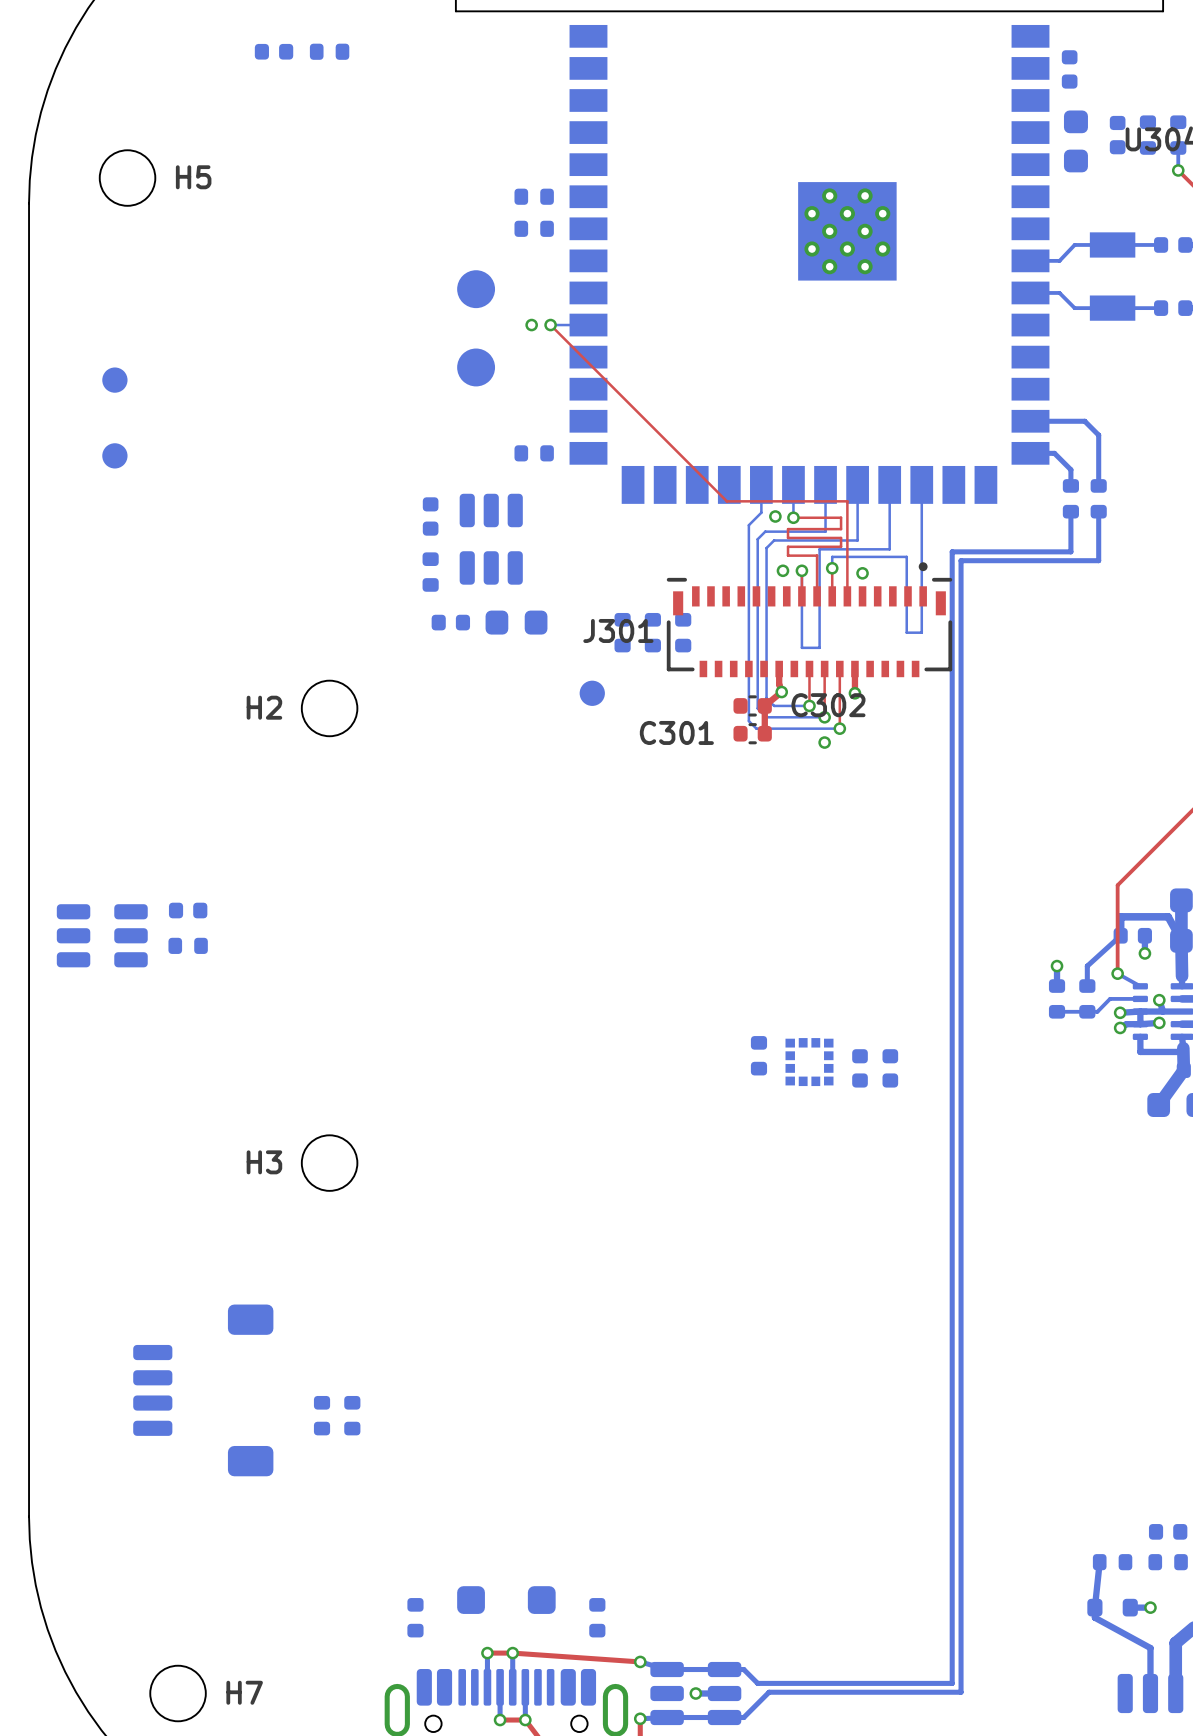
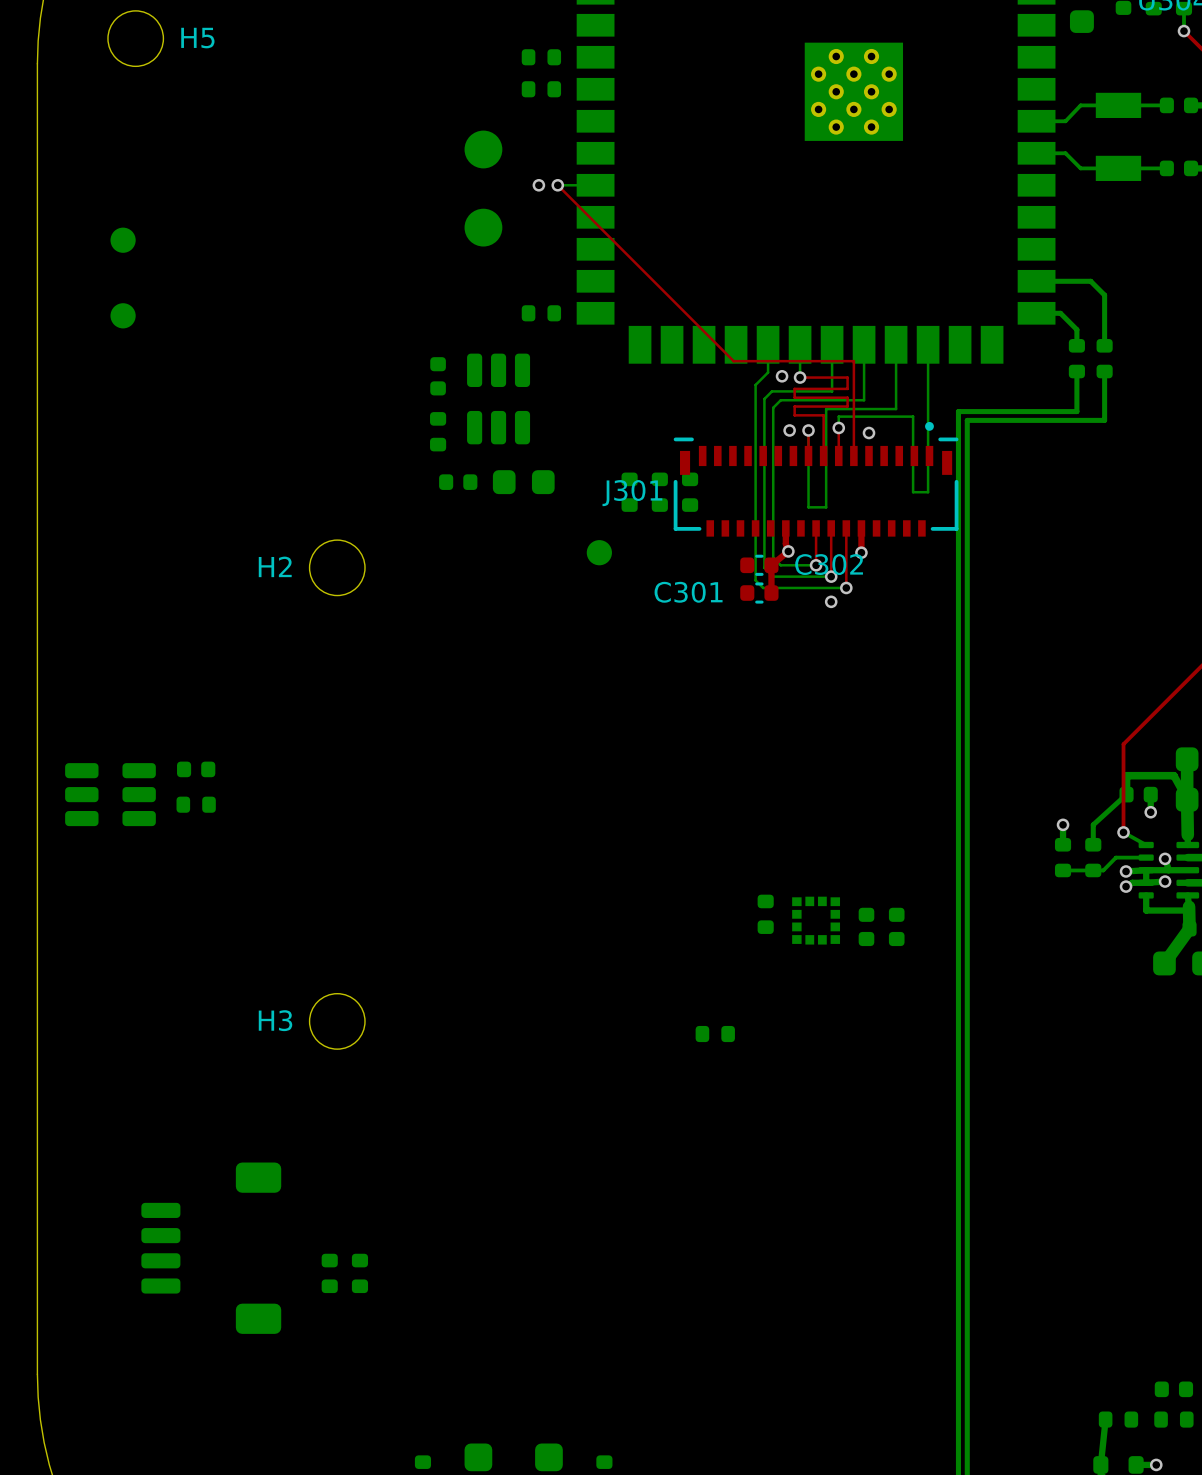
part: none -> (715, 1034)

